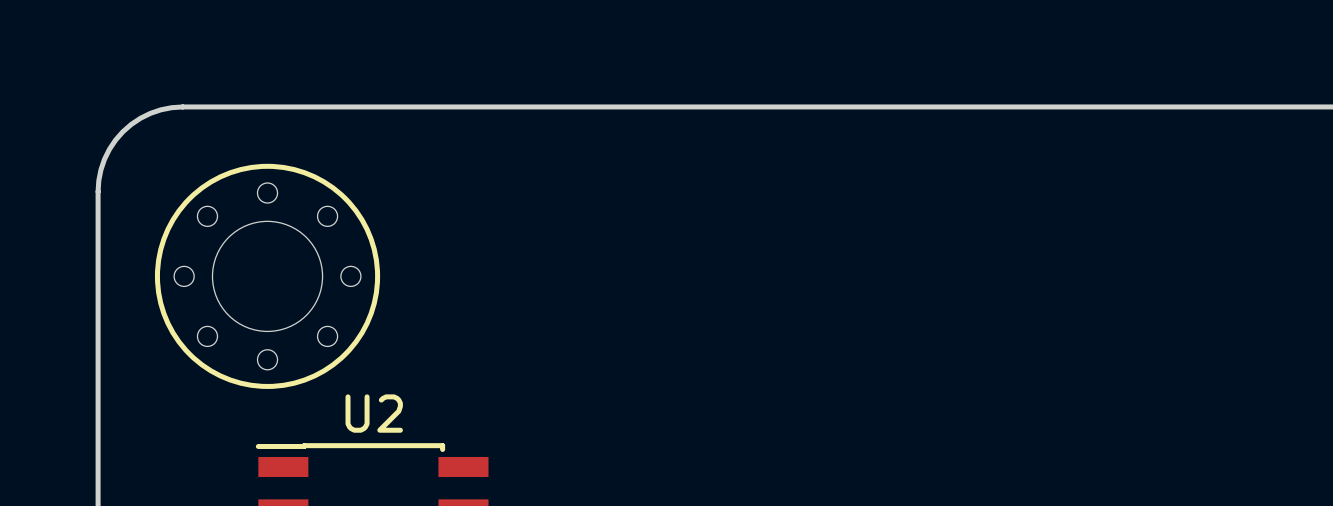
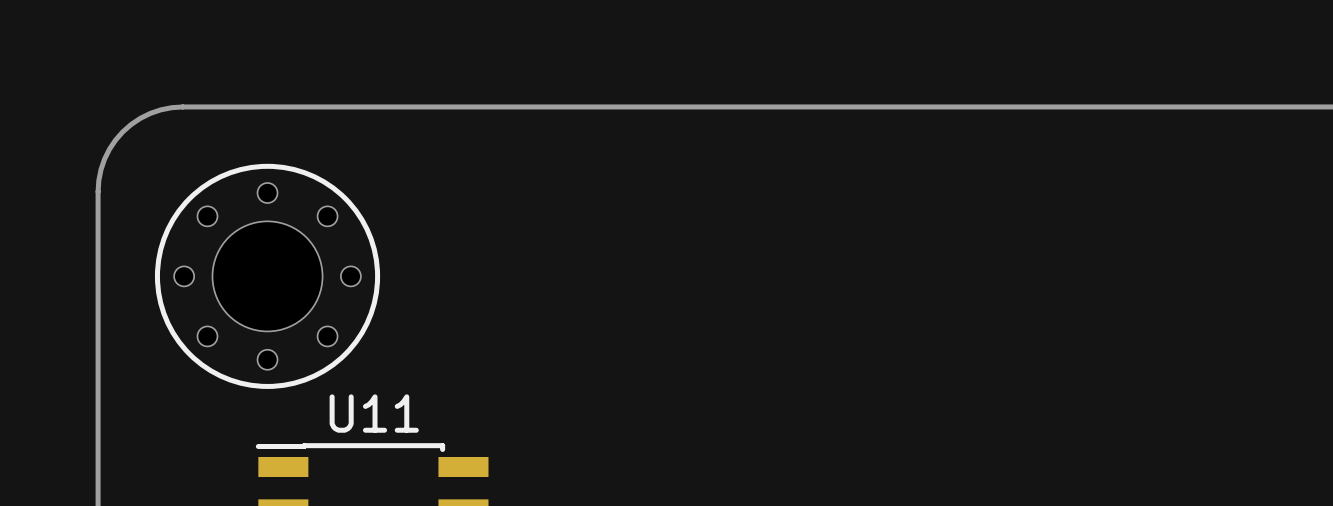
U2 name: U2 (374, 413) -> U11 (374, 413)

